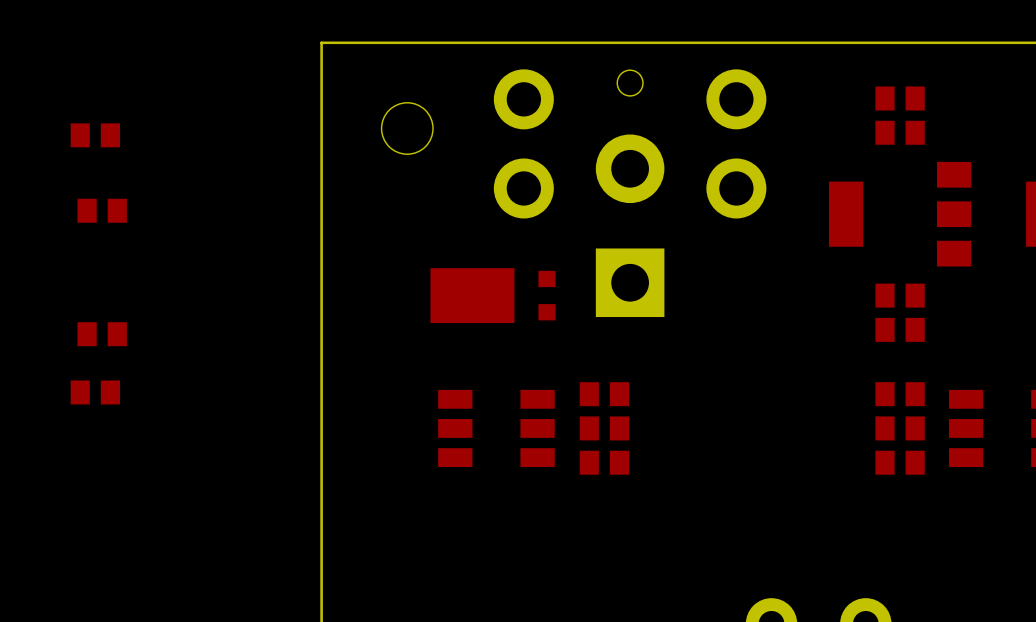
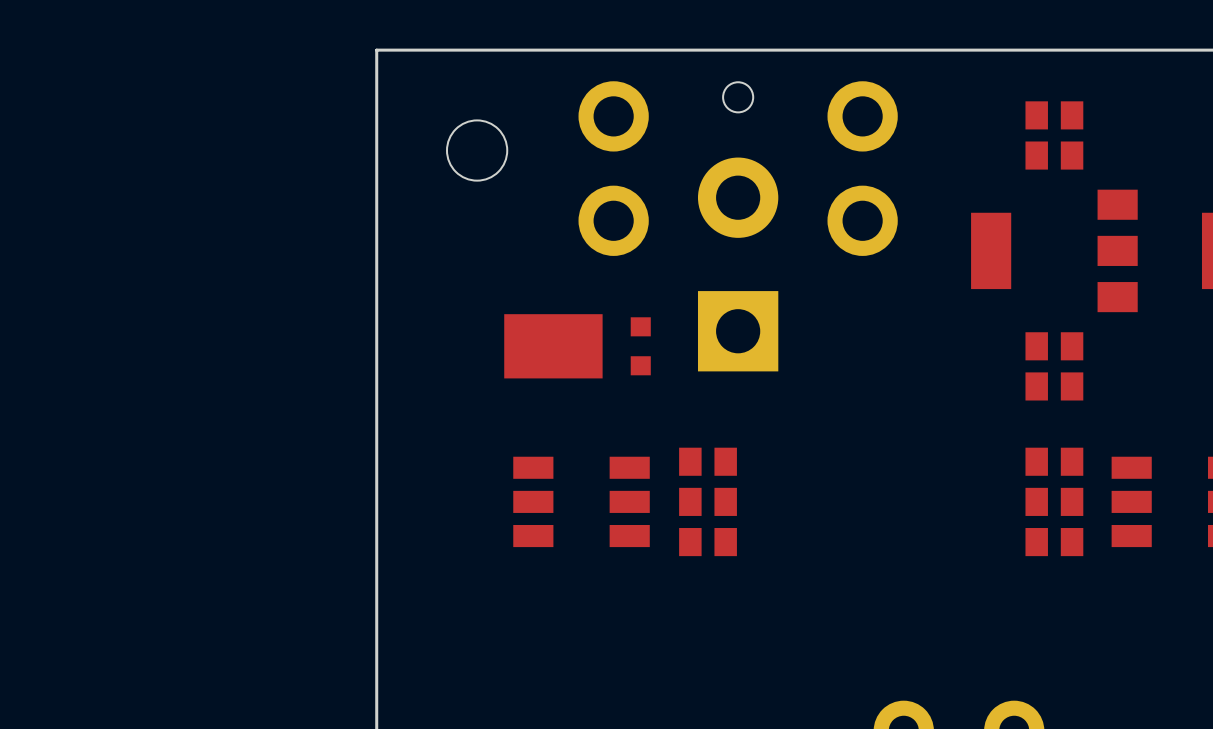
part: (95, 135) -> none
part: (102, 210) -> none
part: (102, 334) -> none
part: (95, 392) -> none

